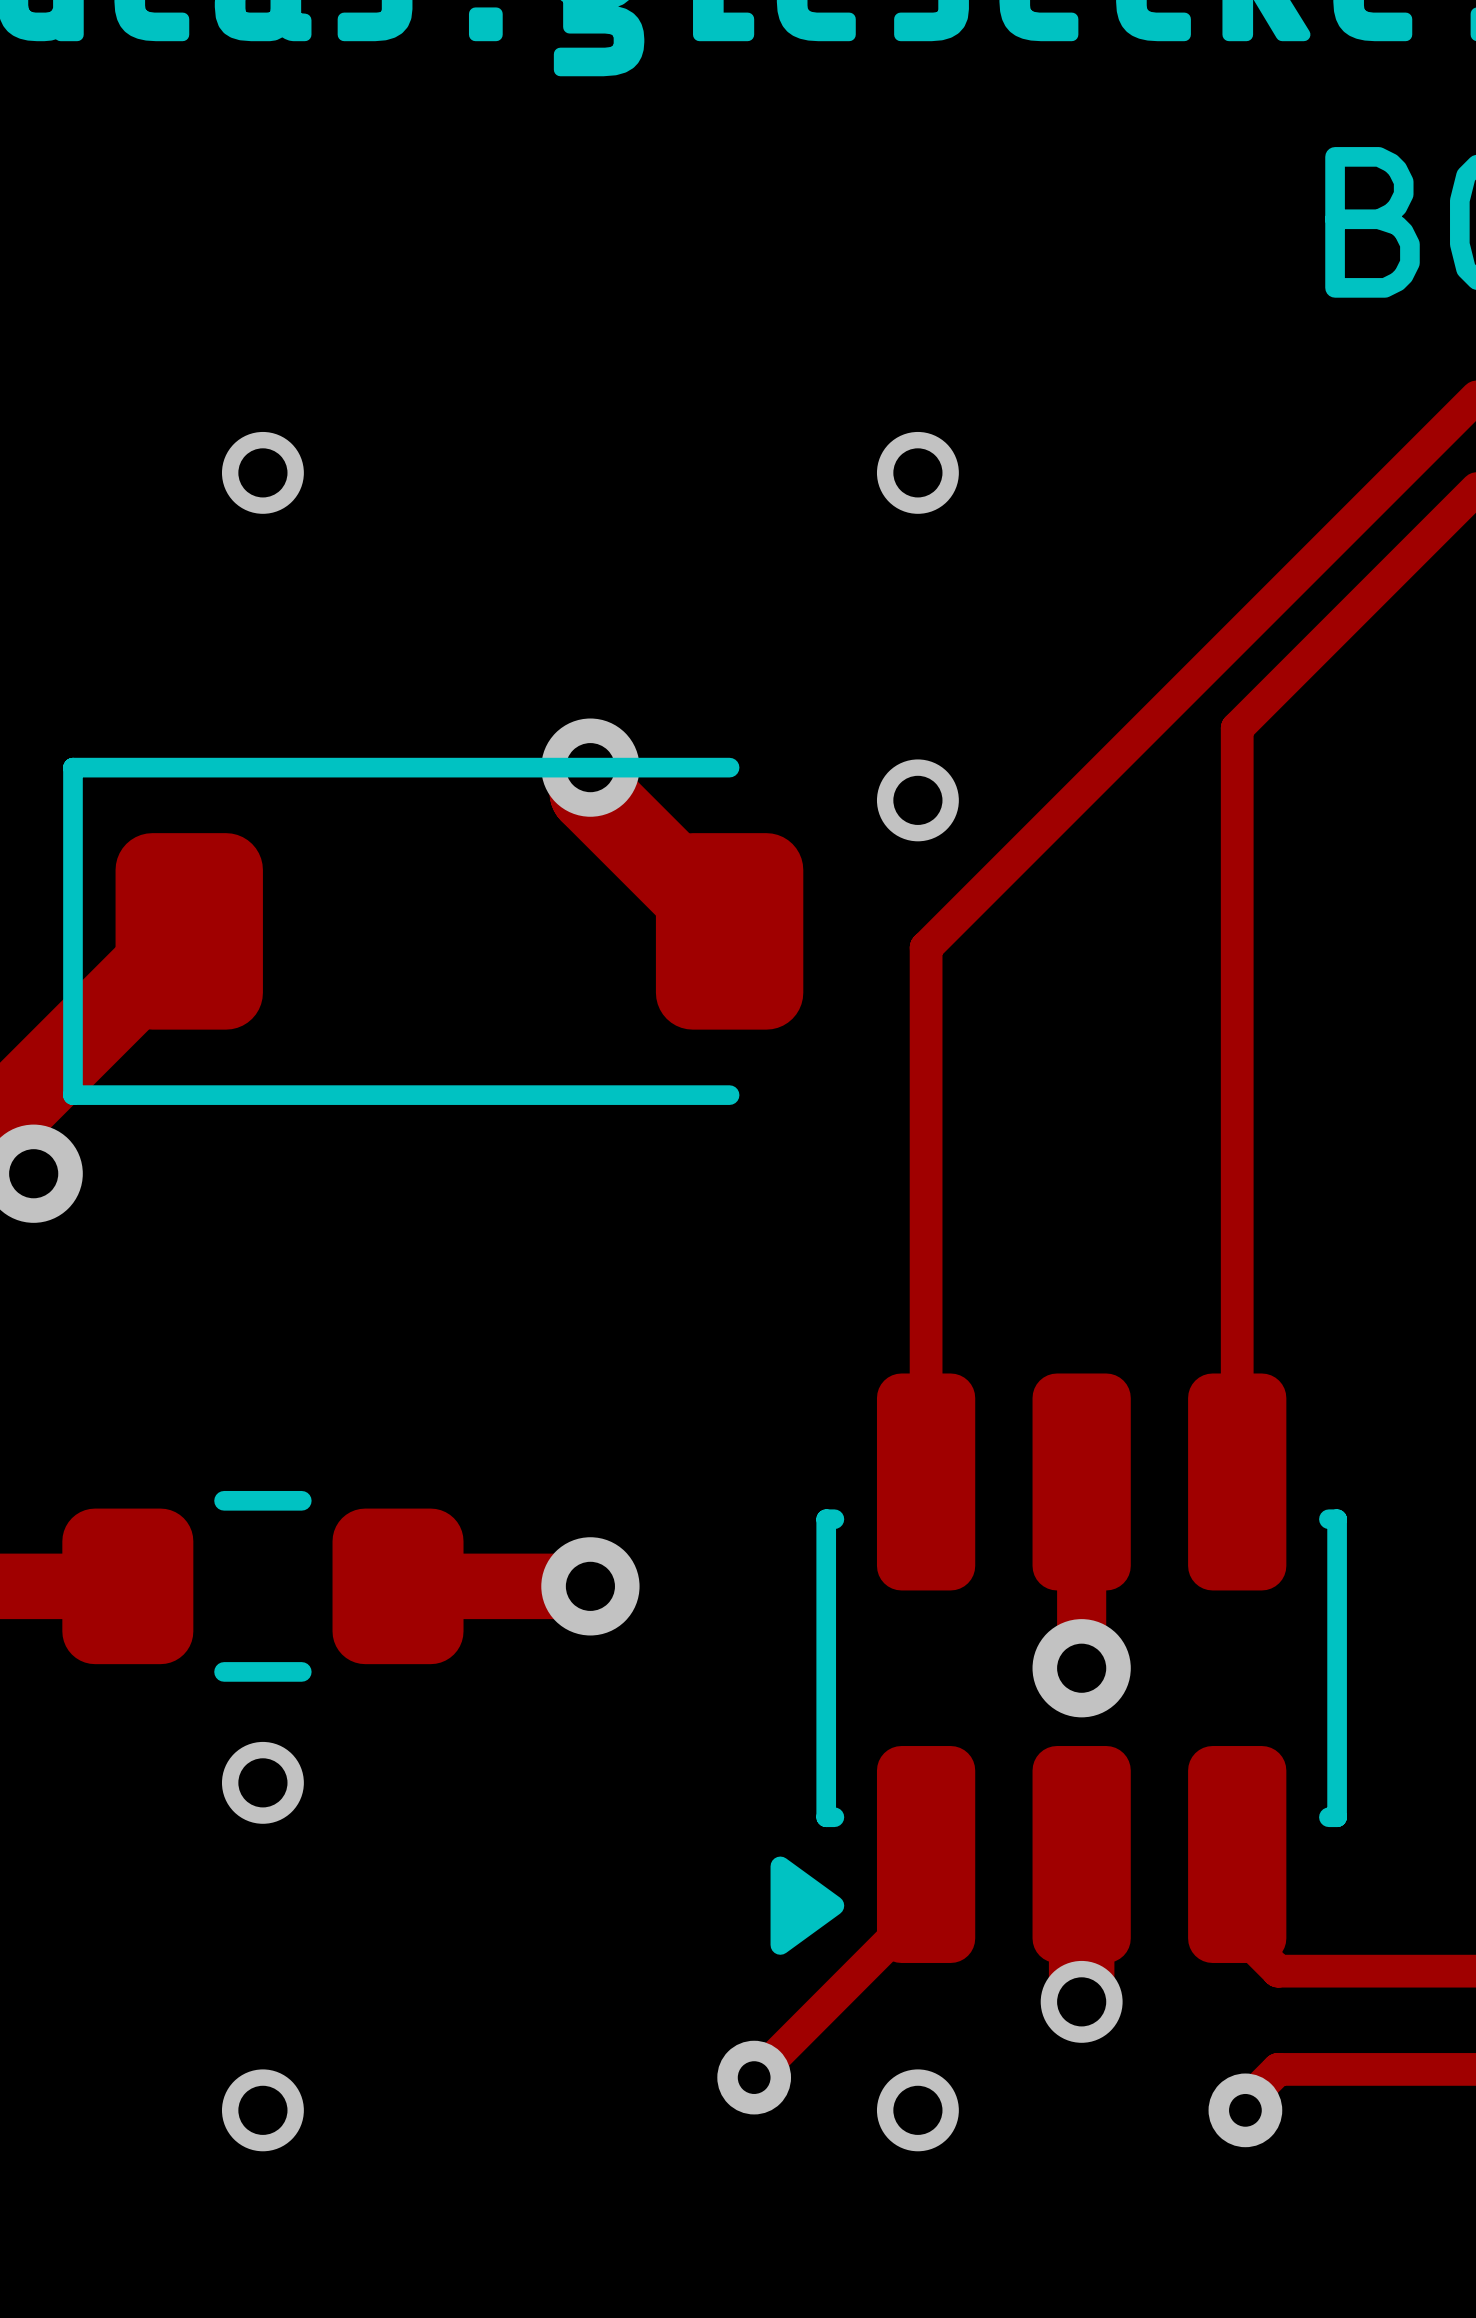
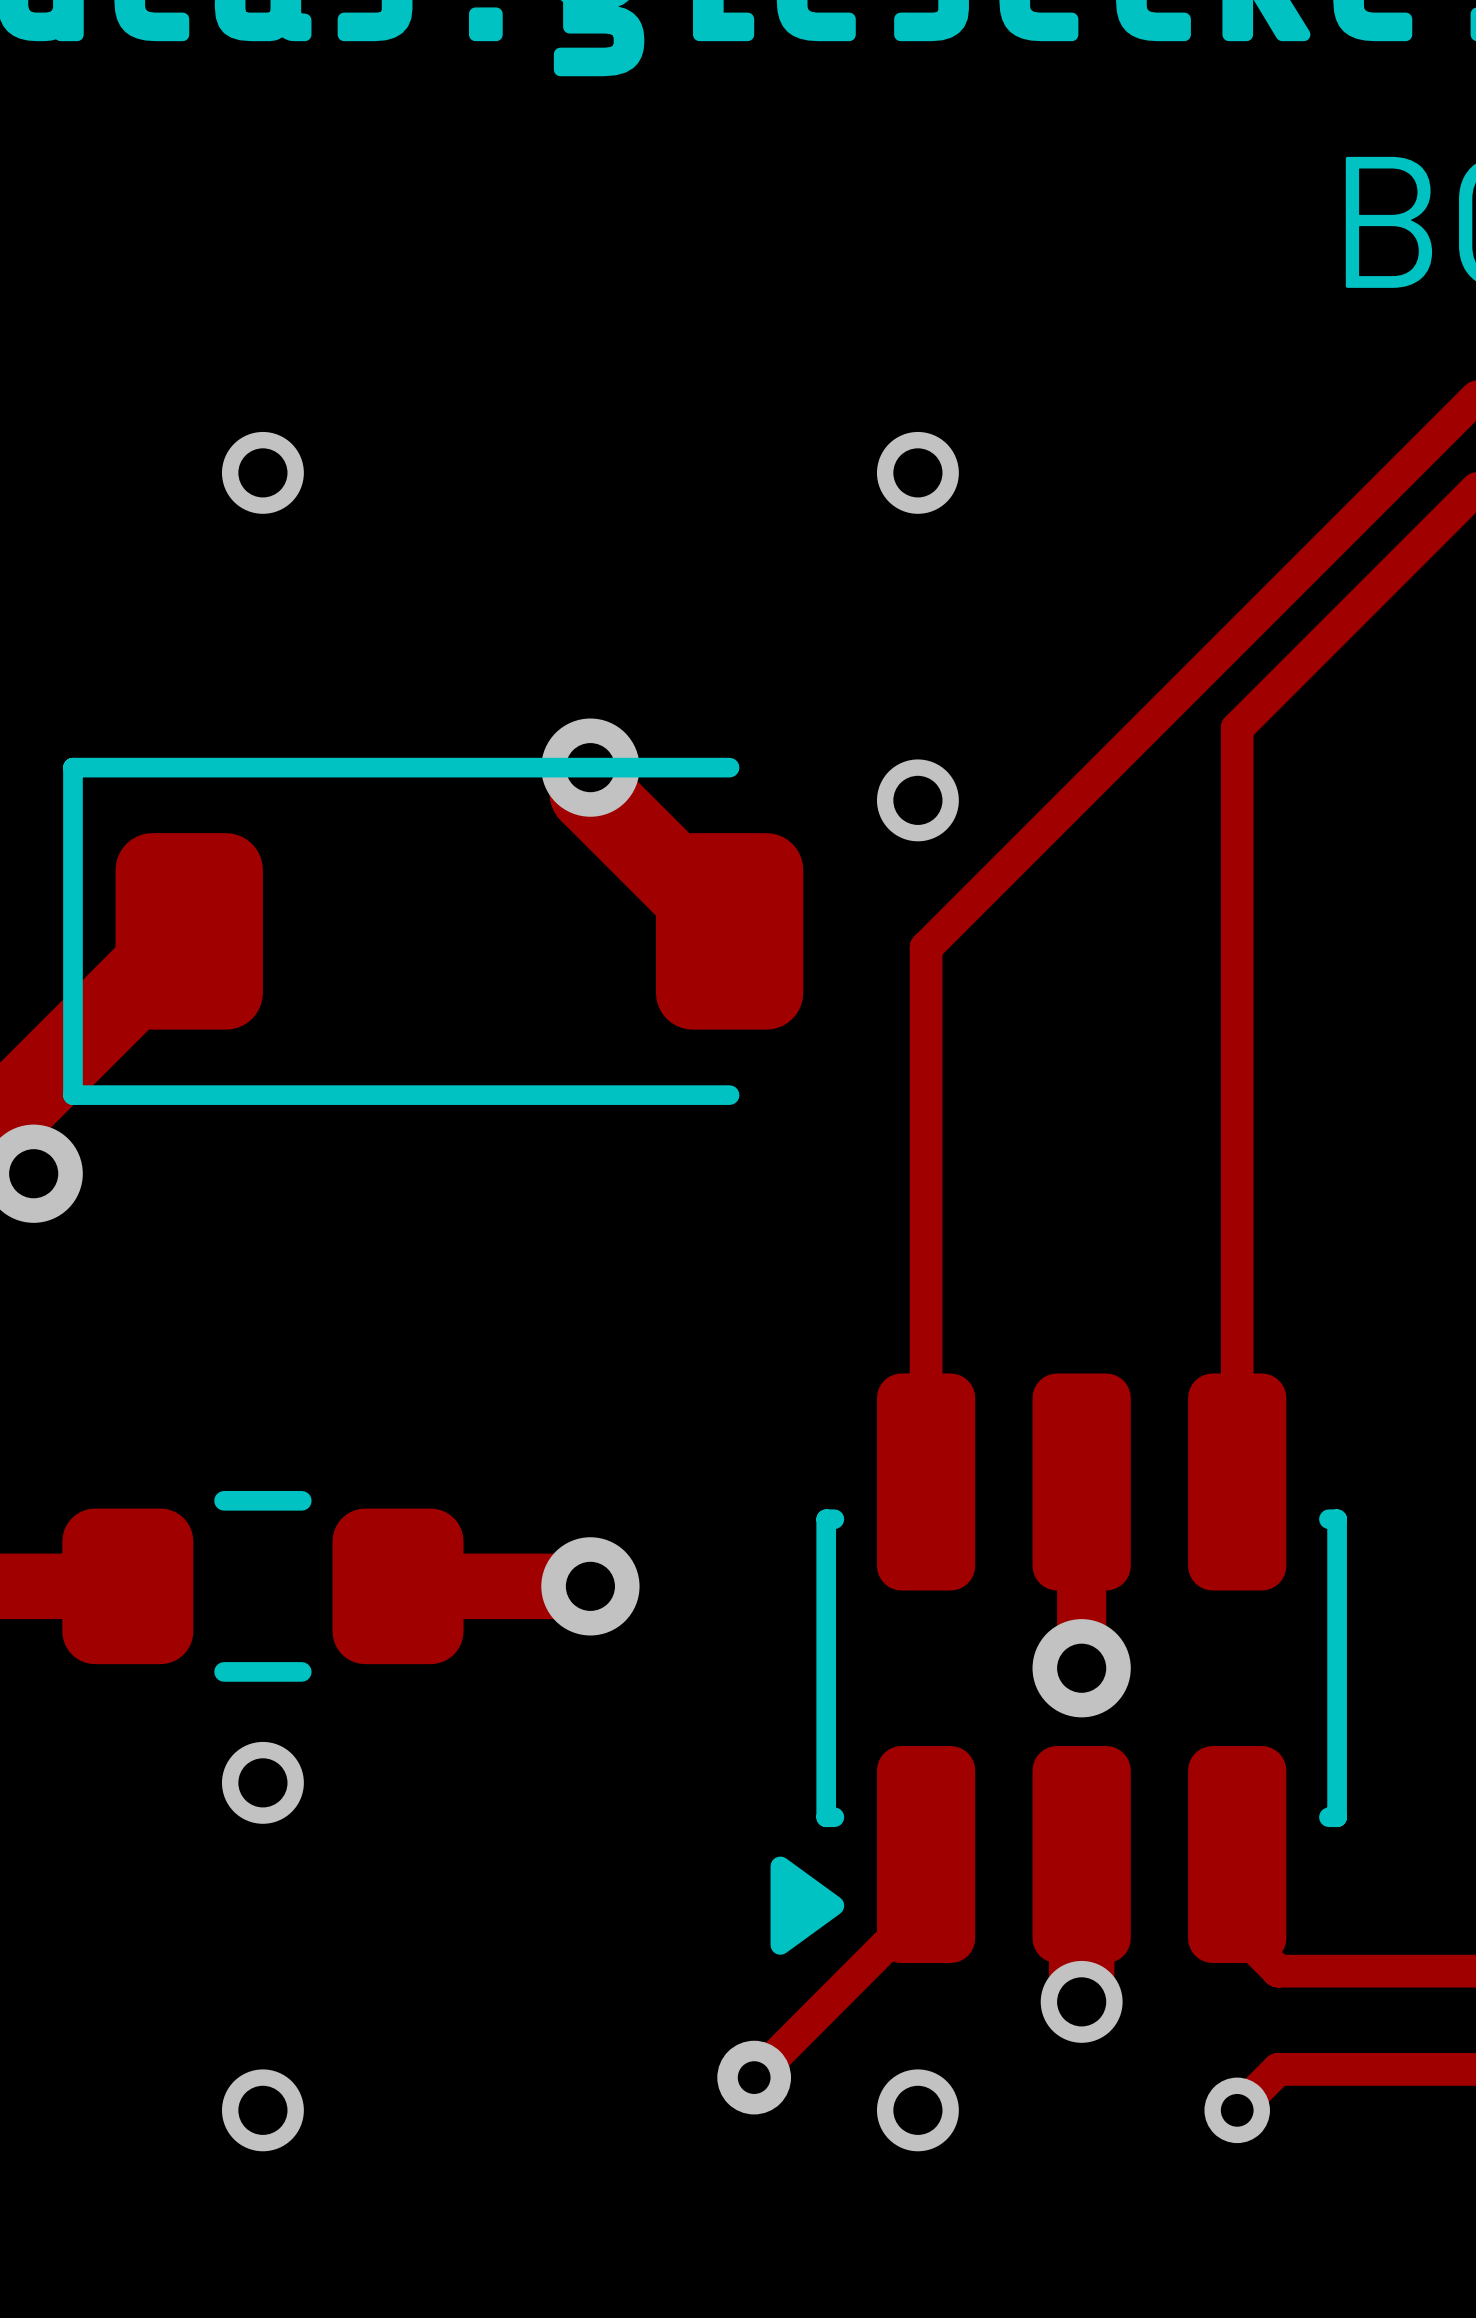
via size: [1208, 2073, 1283, 2148] -> [1204, 2077, 1270, 2144]

